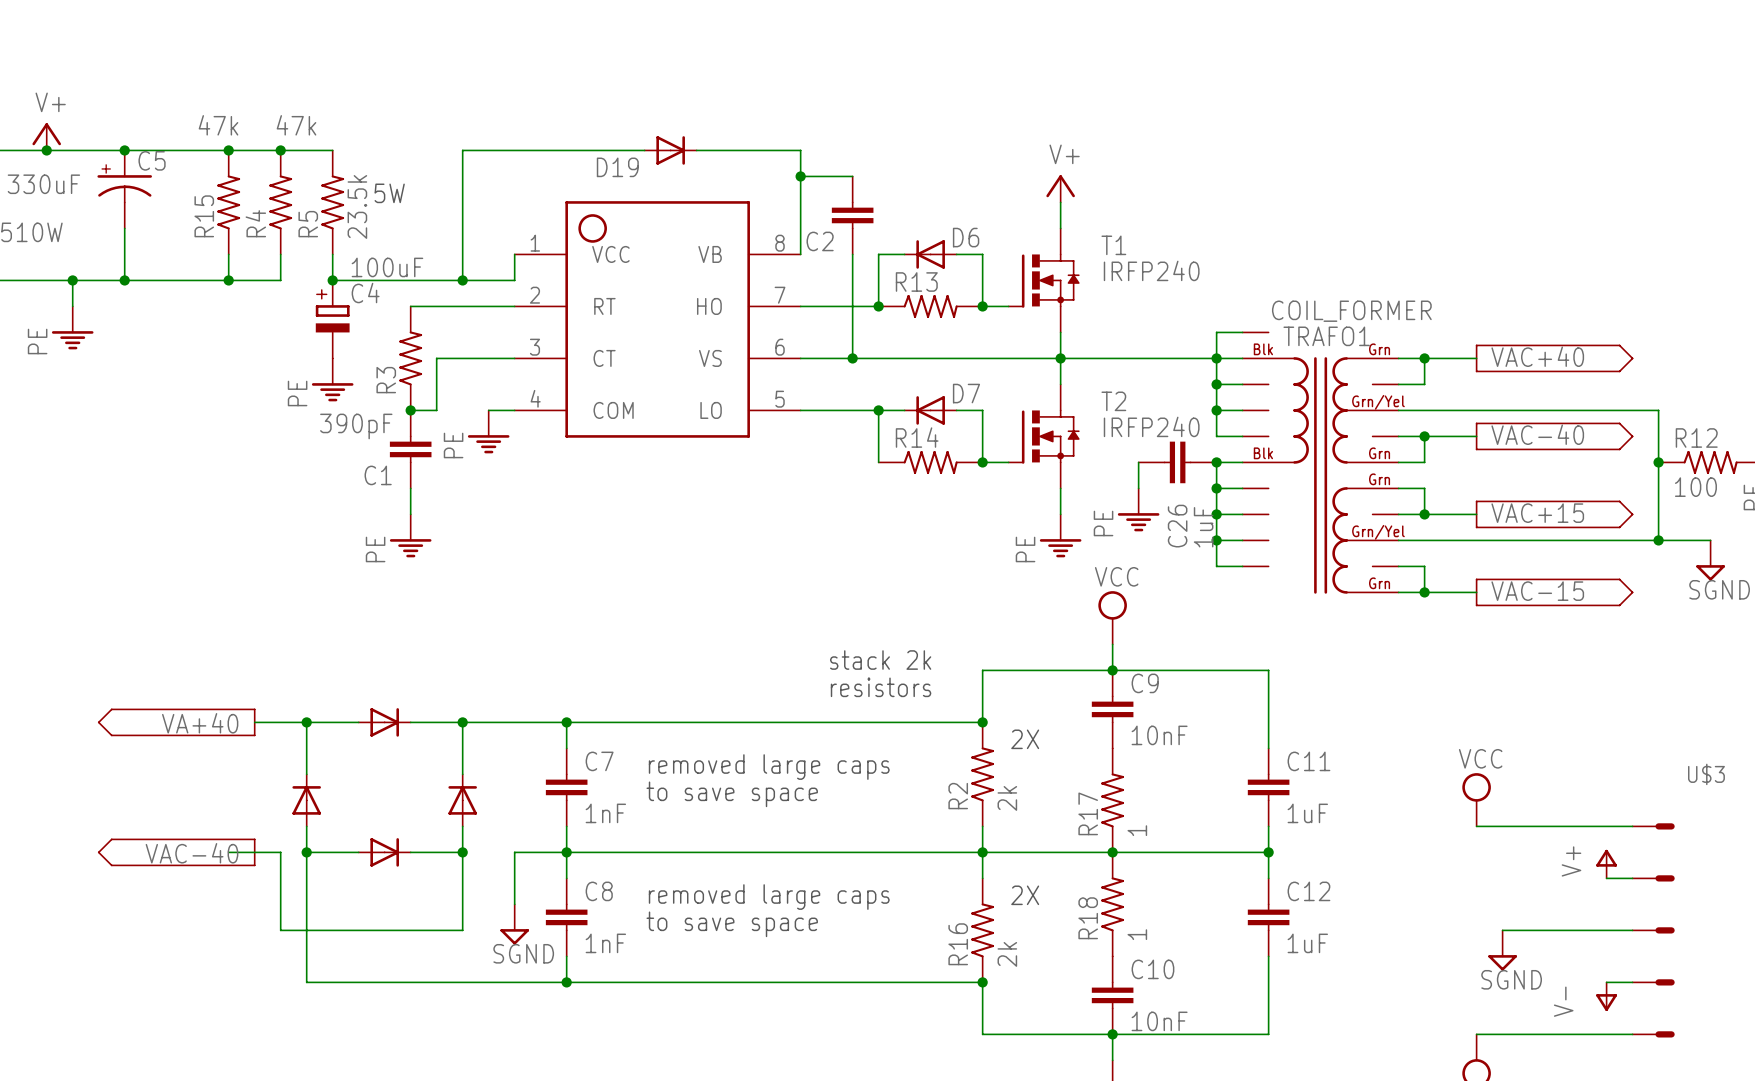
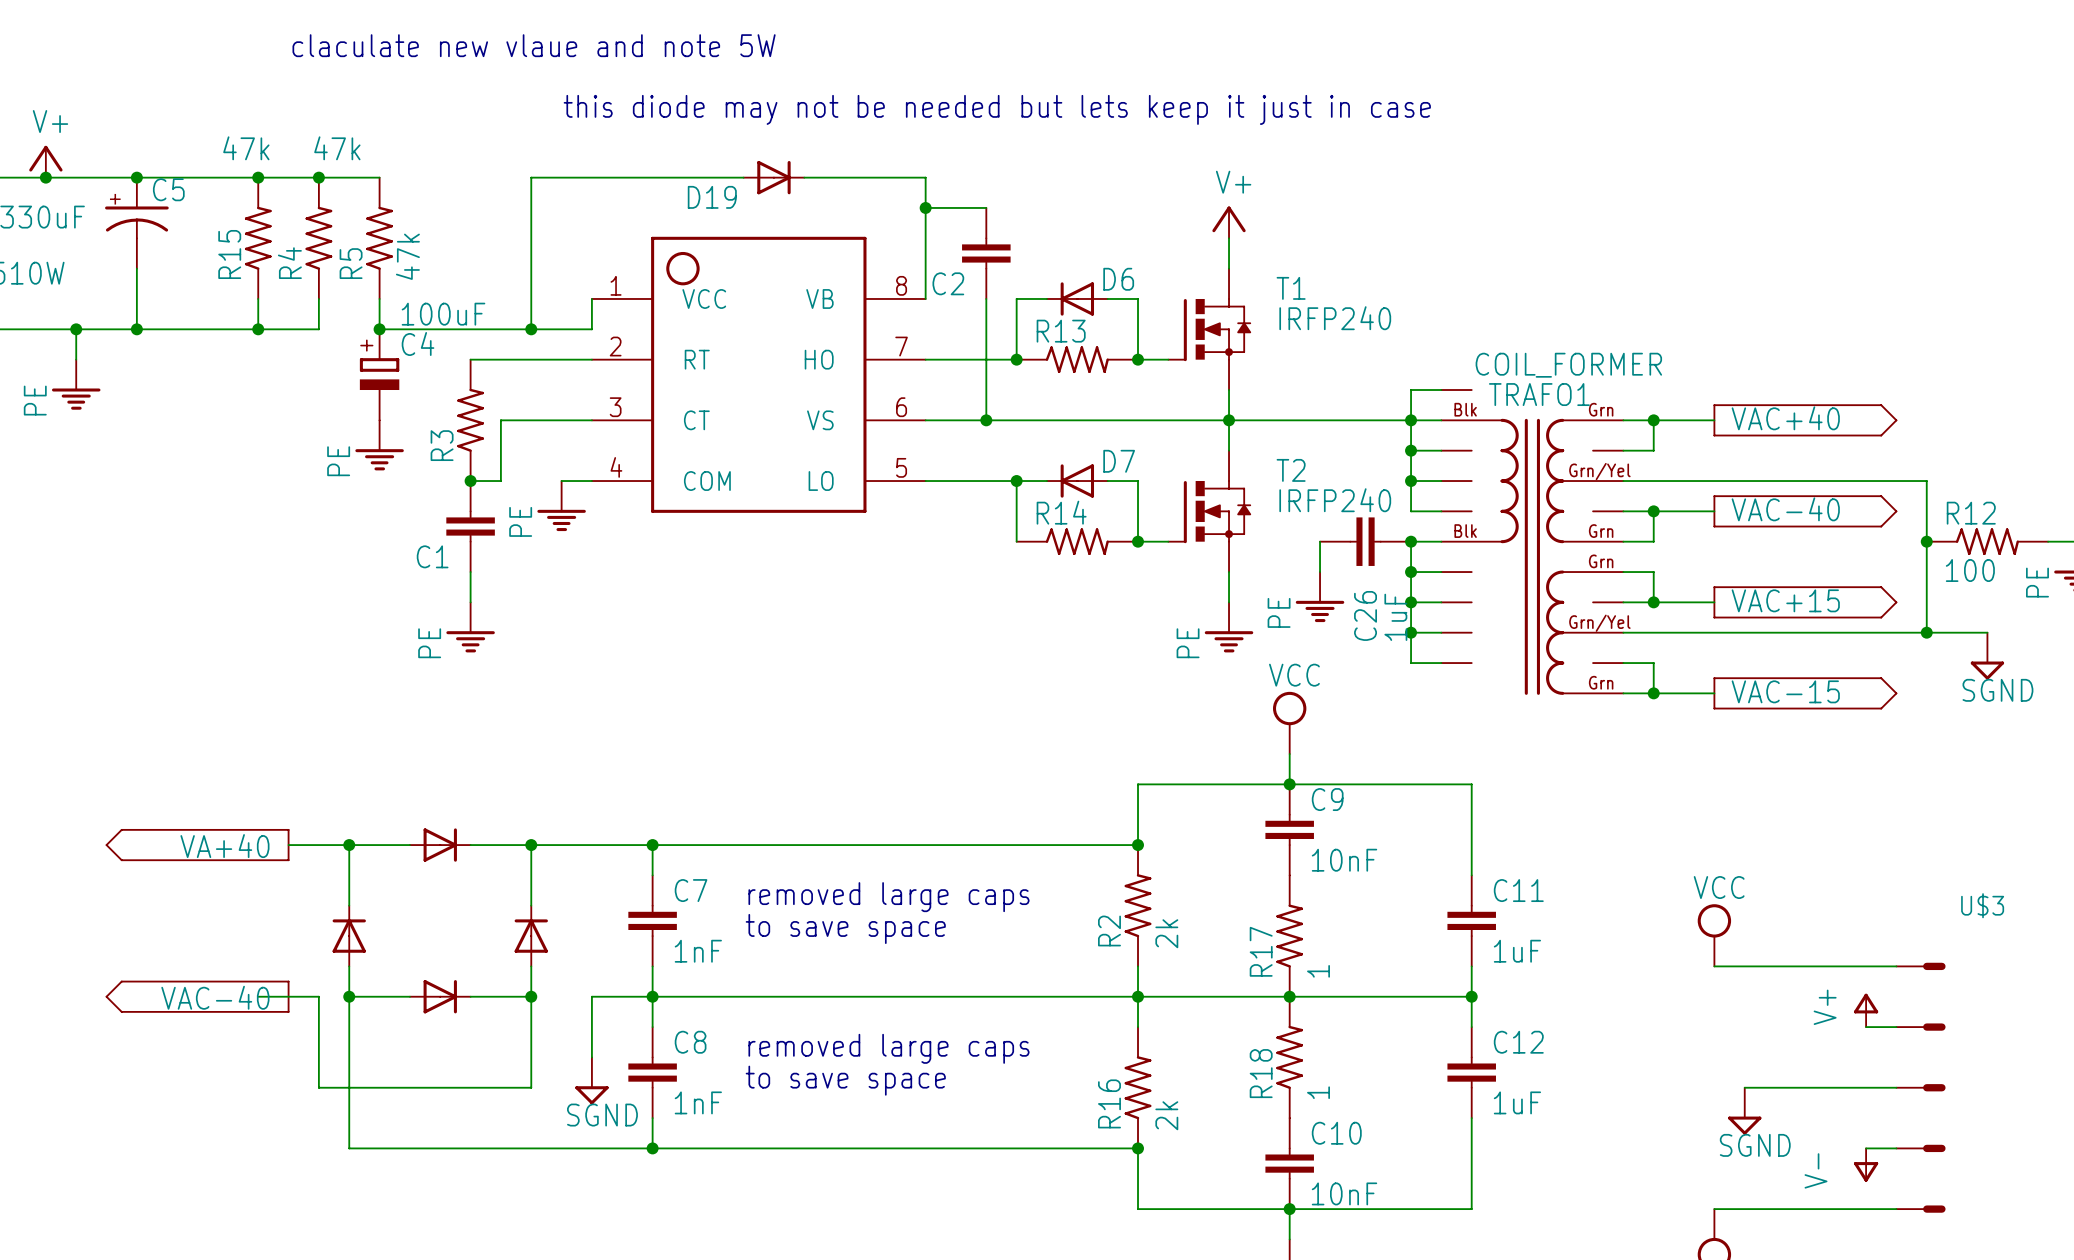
text: none -> claculate new vlaue and note 5W (534, 45)
text: none -> this diode may not be needed but lets keep it just in case (997, 109)
text: 5W (389, 193) -> none
R5 value: 23.5k (357, 206) -> 47k (407, 256)
C1 value: 390pF (356, 426) -> none
text: stack 2k (880, 660) -> none
text: resistors (881, 687) -> none
text: 2X (1025, 739) -> none
text: 2X (1025, 895) -> none

